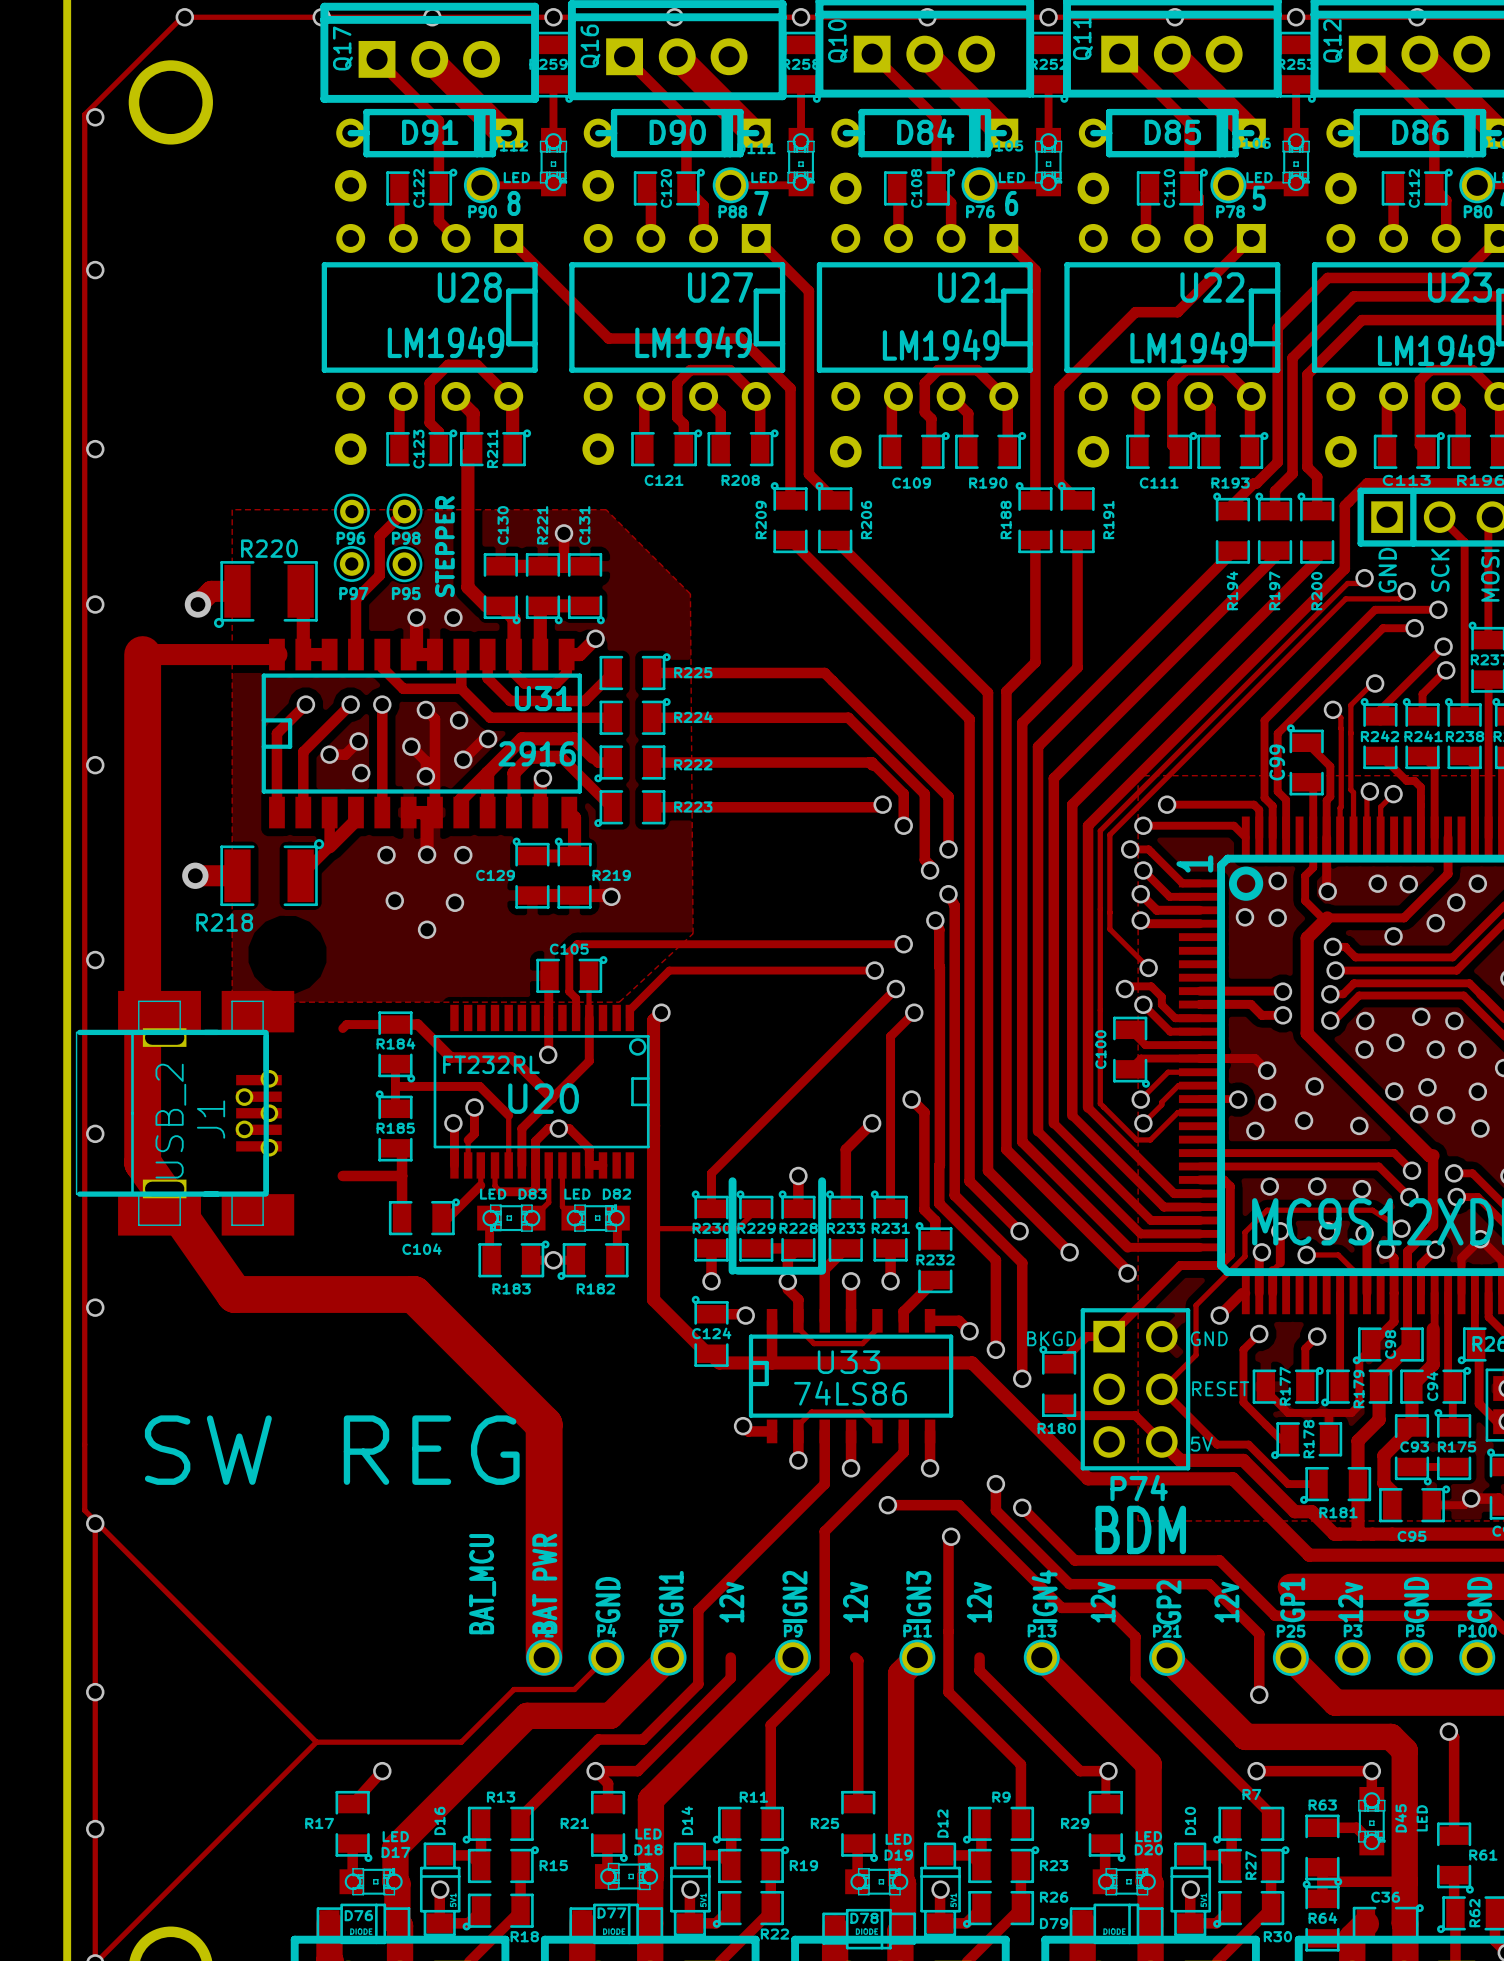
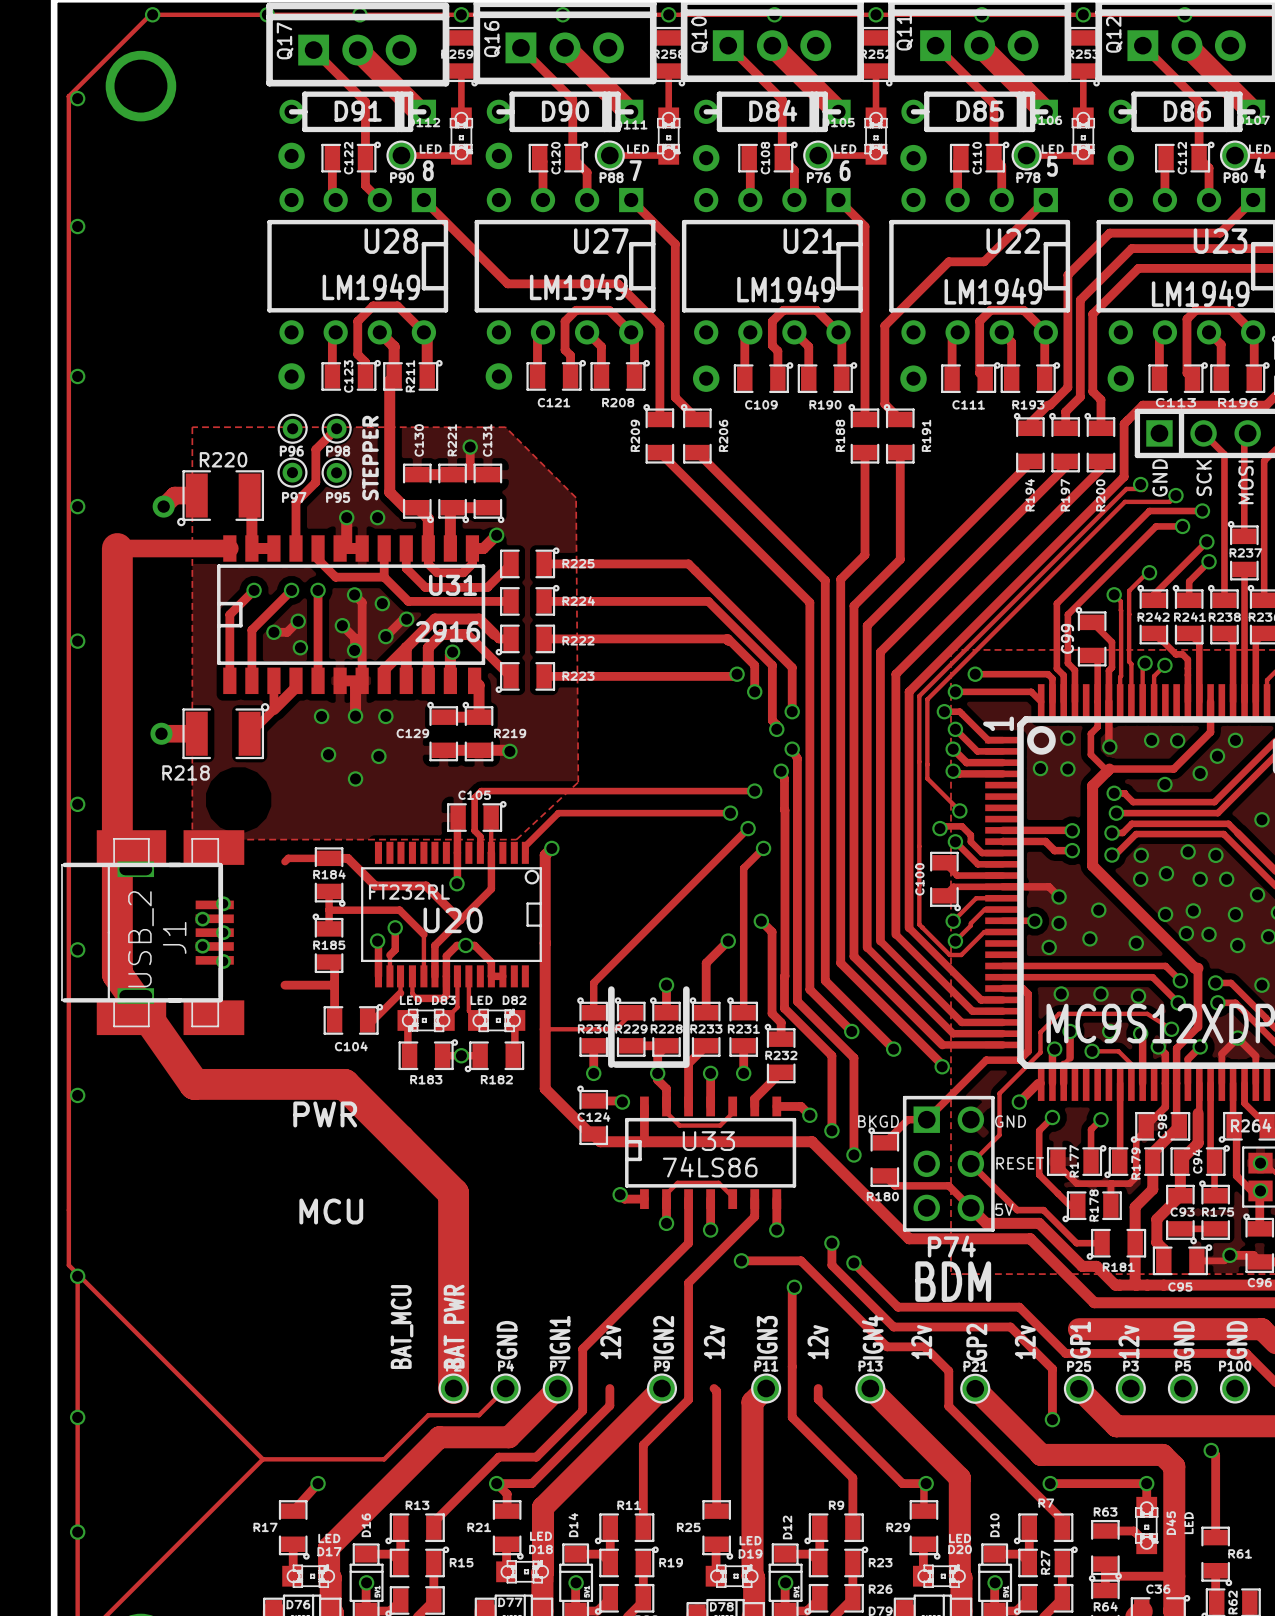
text: none -> PWR (325, 1114)
text: none -> MCU (331, 1211)
text: SW REG (332, 1450) -> none

